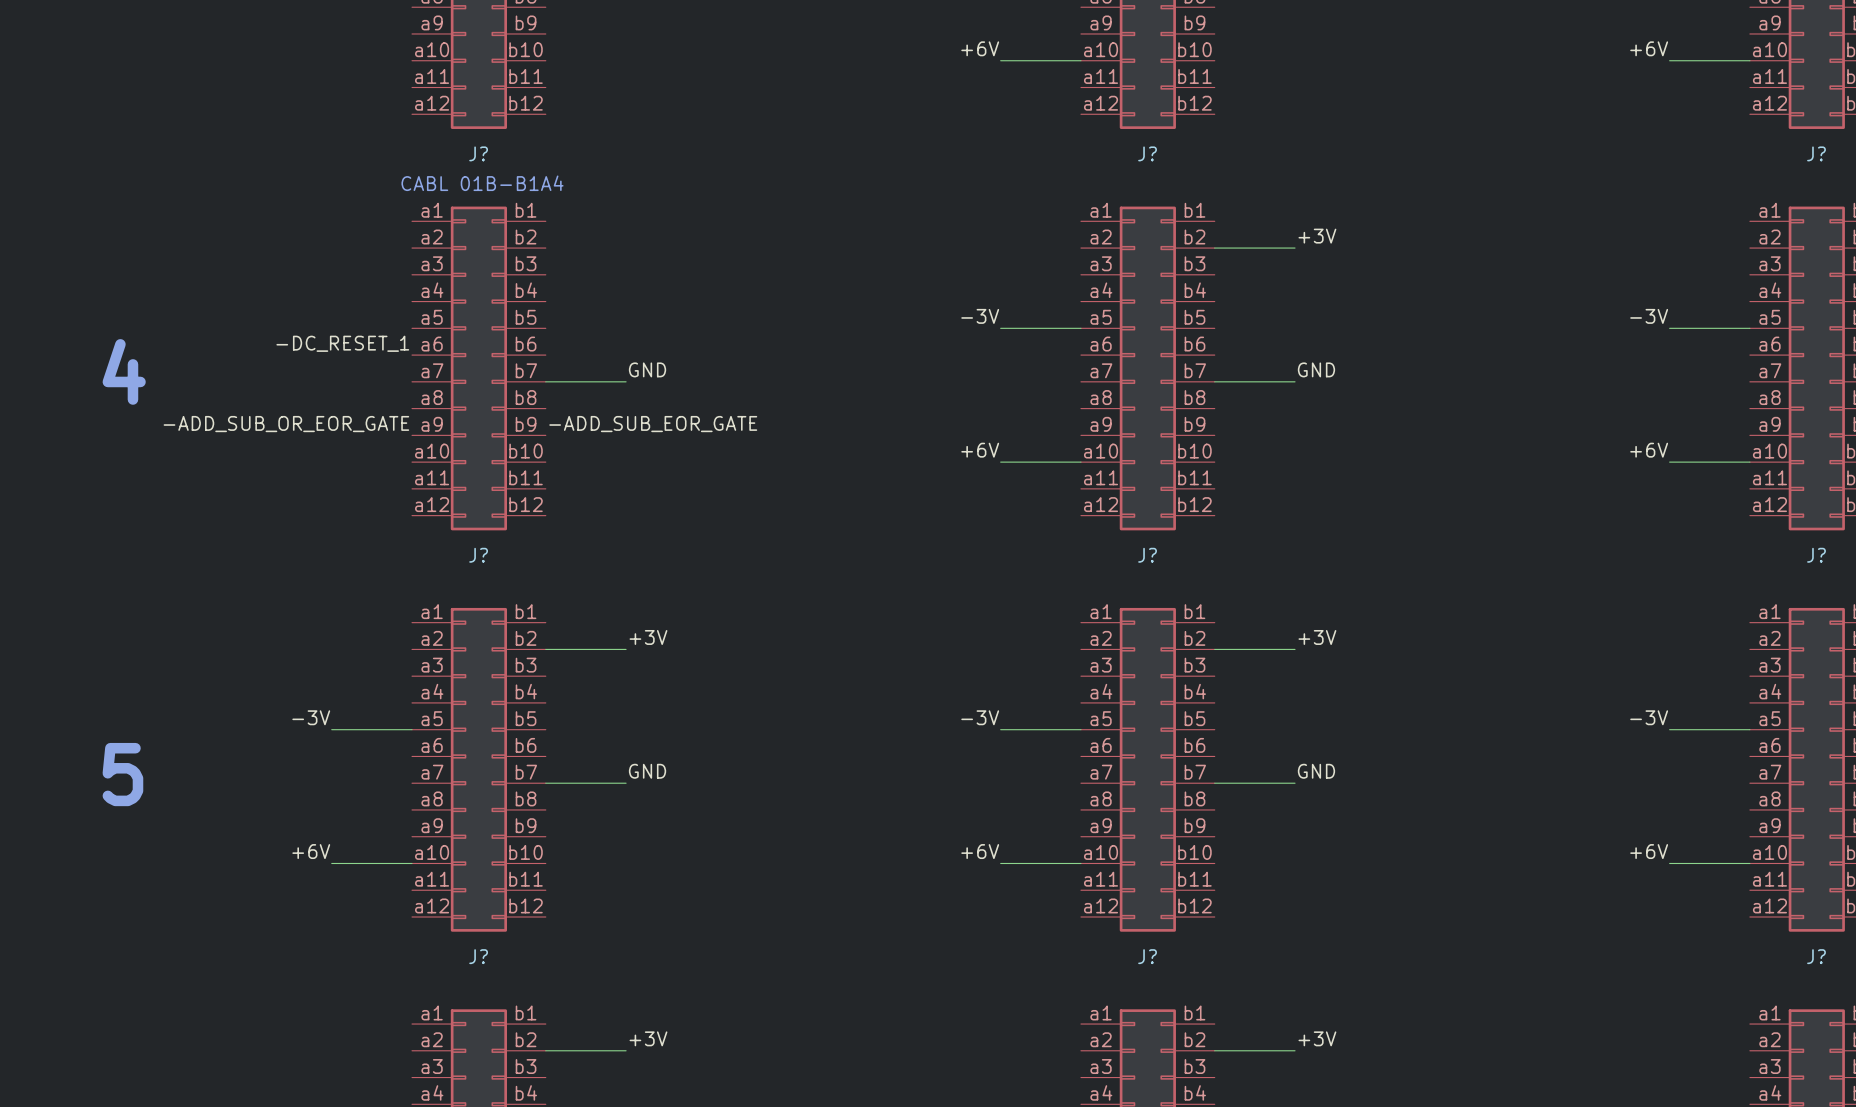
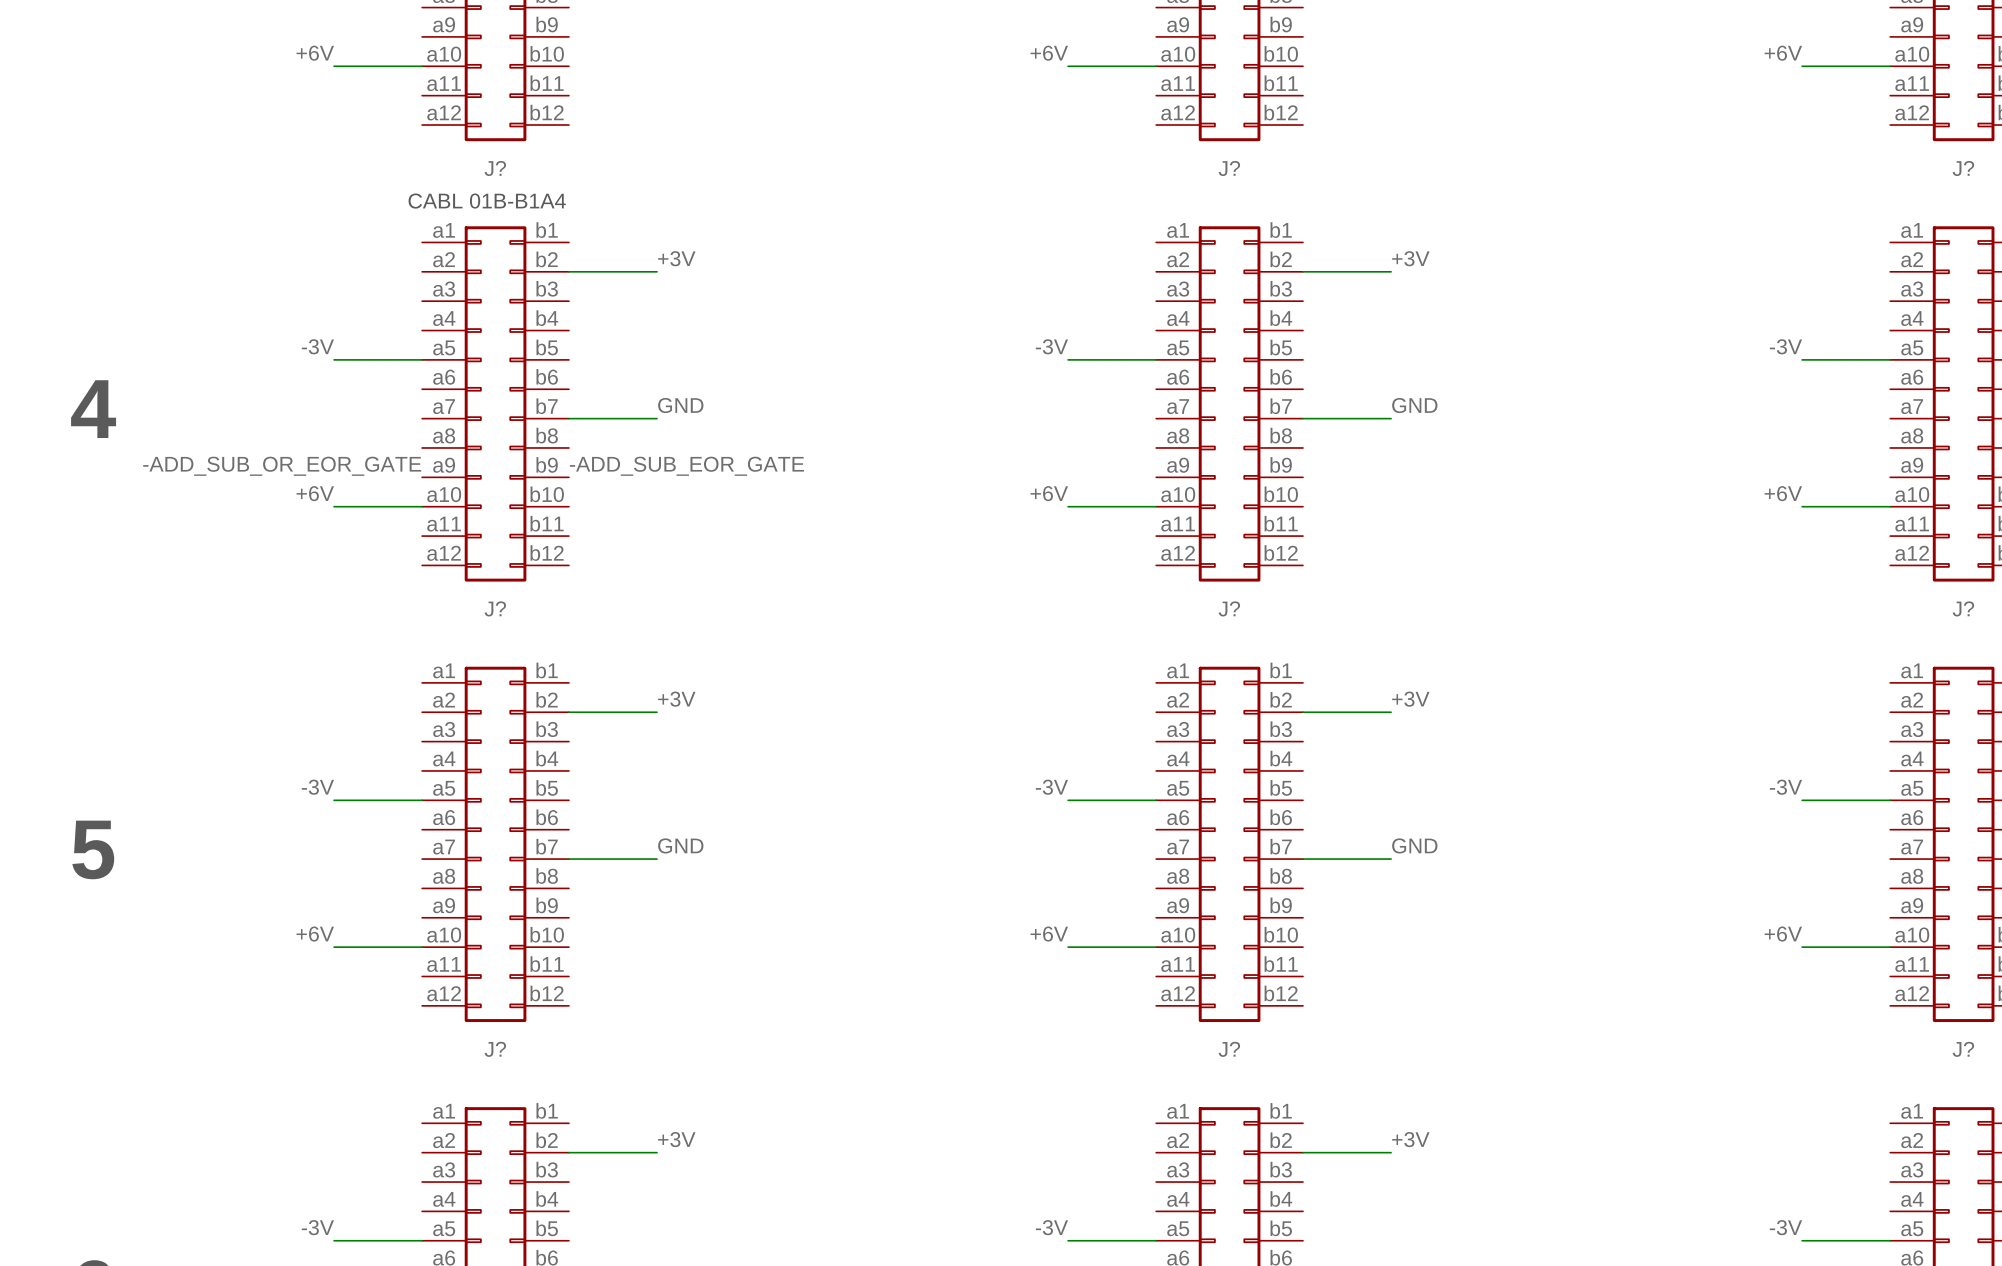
label: none -> +6V (315, 53)
wire: none -> (334, 66) (422, 66)
label: none -> +3V (676, 258)
wire: none -> (568, 271) (657, 271)
label: none -> -3V (317, 346)
wire: none -> (334, 359) (422, 359)
label: -DC_RESET_1 (342, 343) -> none
label: none -> +6V (315, 493)
wire: none -> (334, 506) (422, 506)

